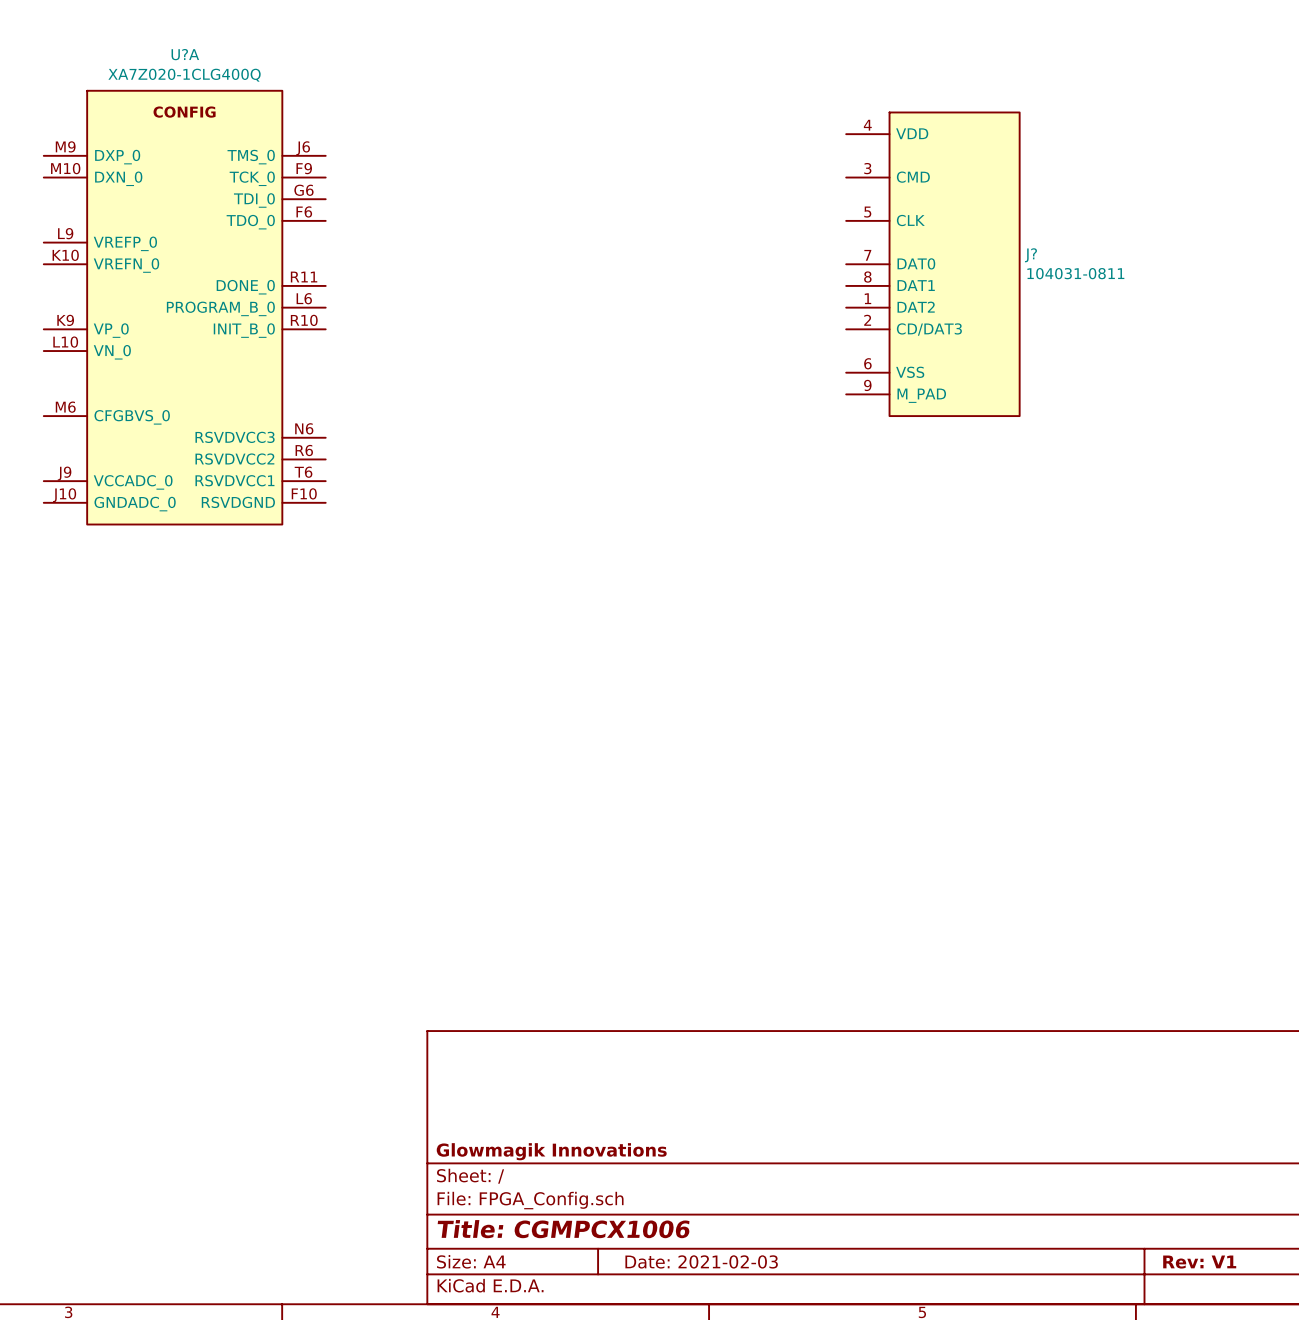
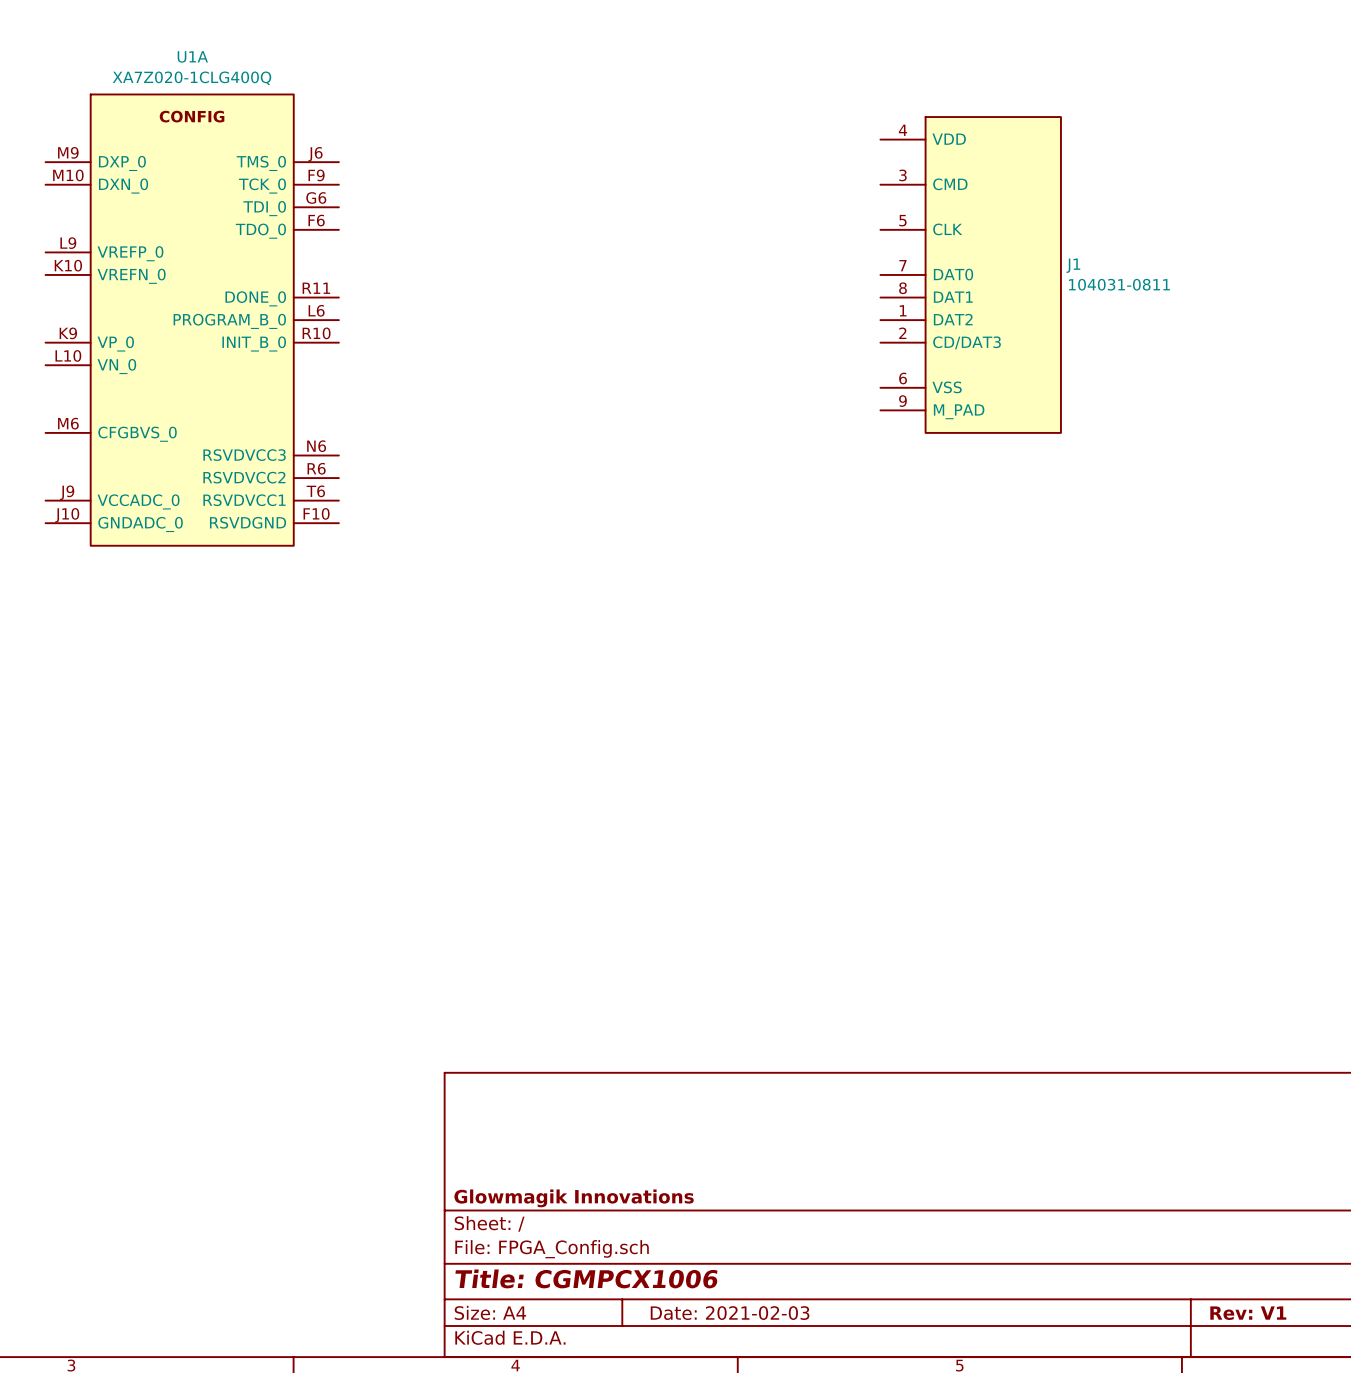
U?A name: U?A (185, 54) -> U1A (192, 56)
J? name: J? (1030, 255) -> J1 (1073, 265)

